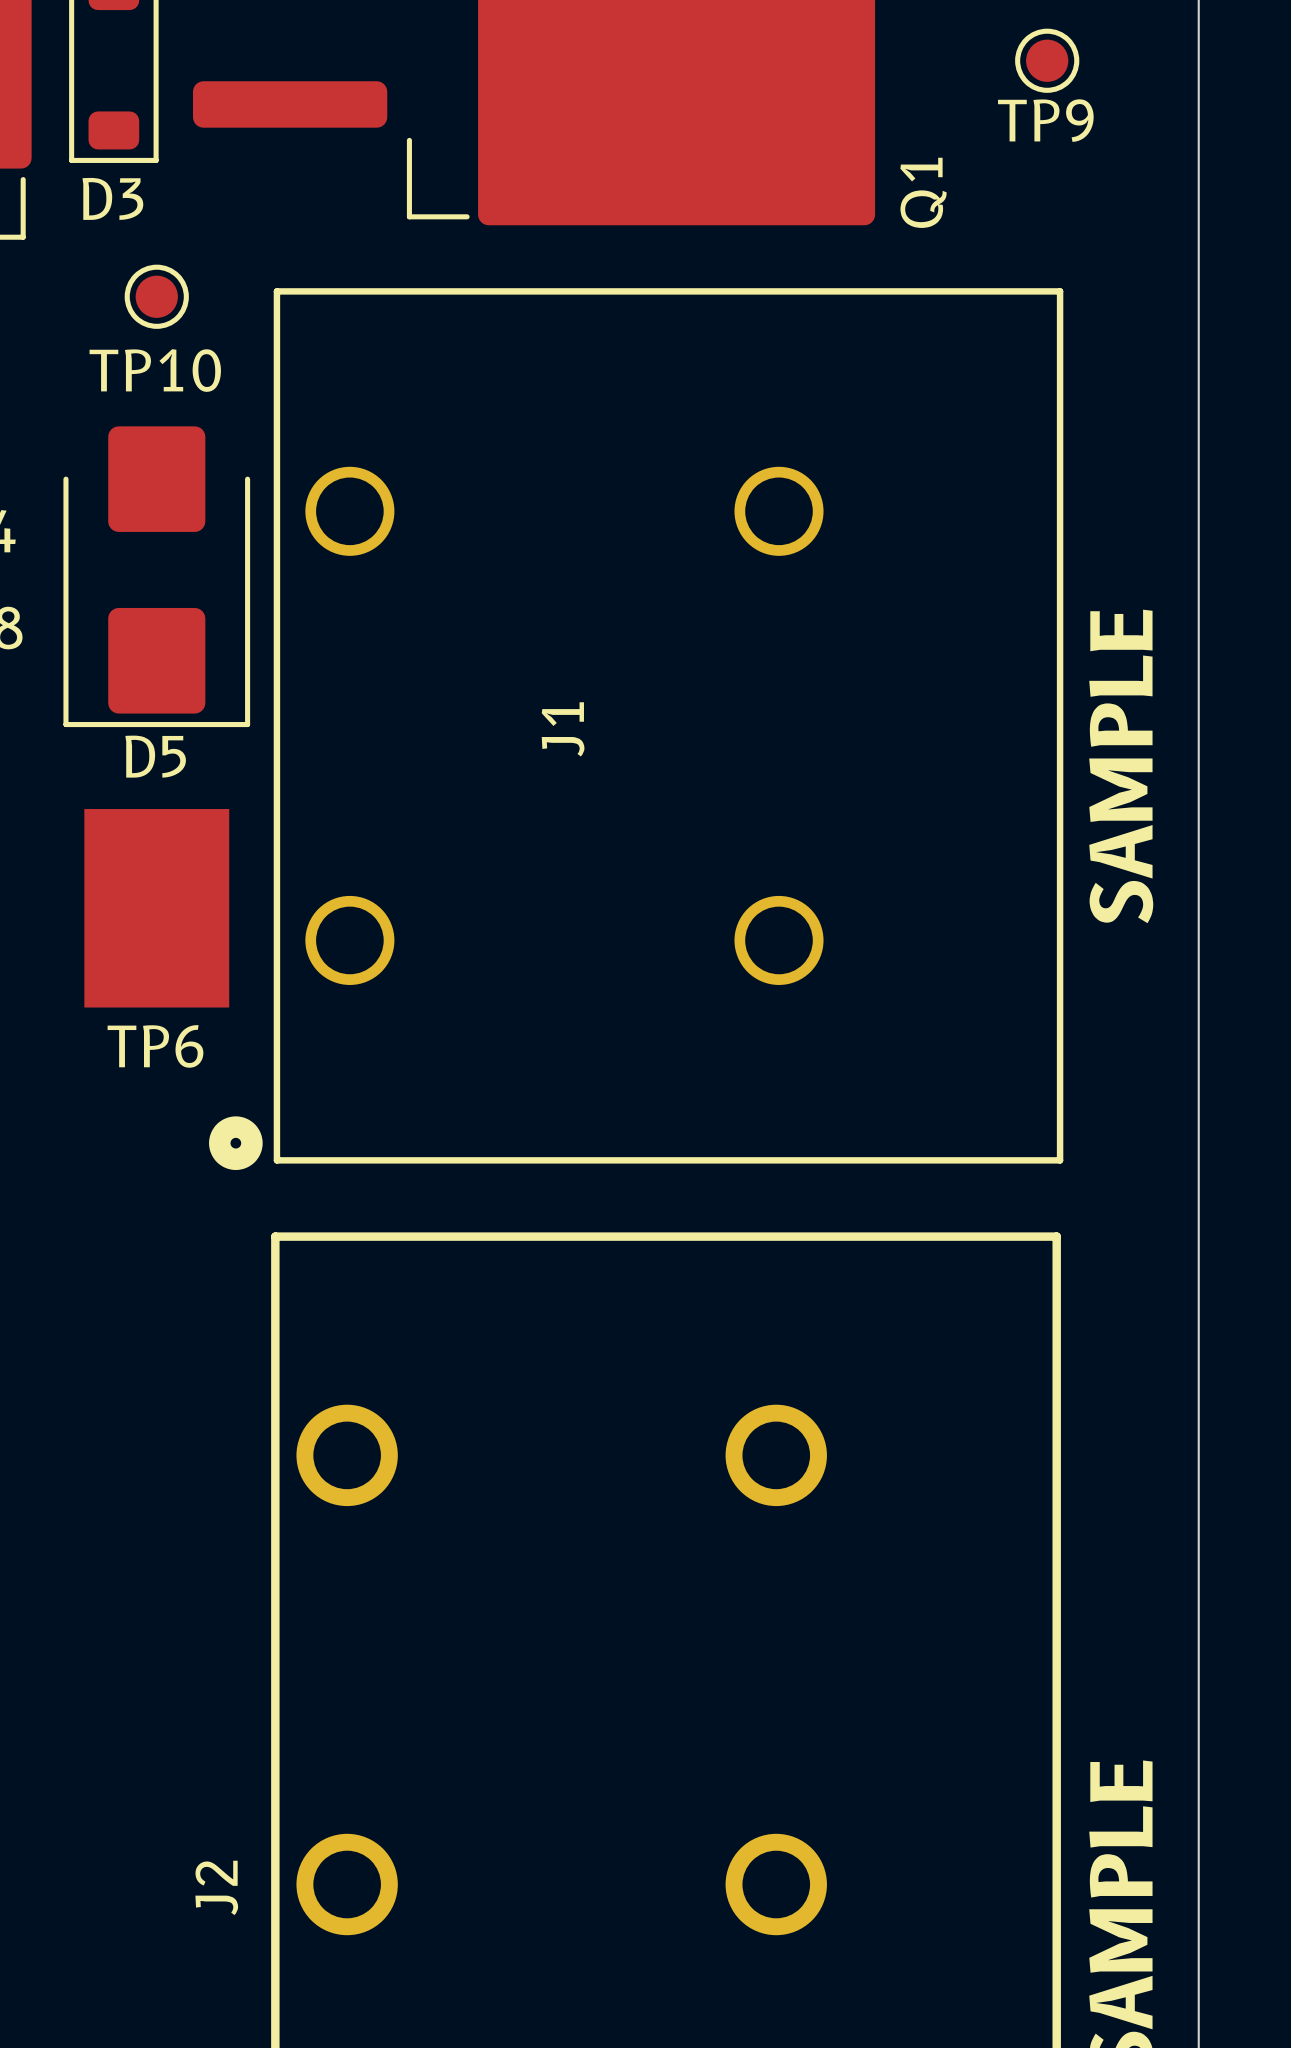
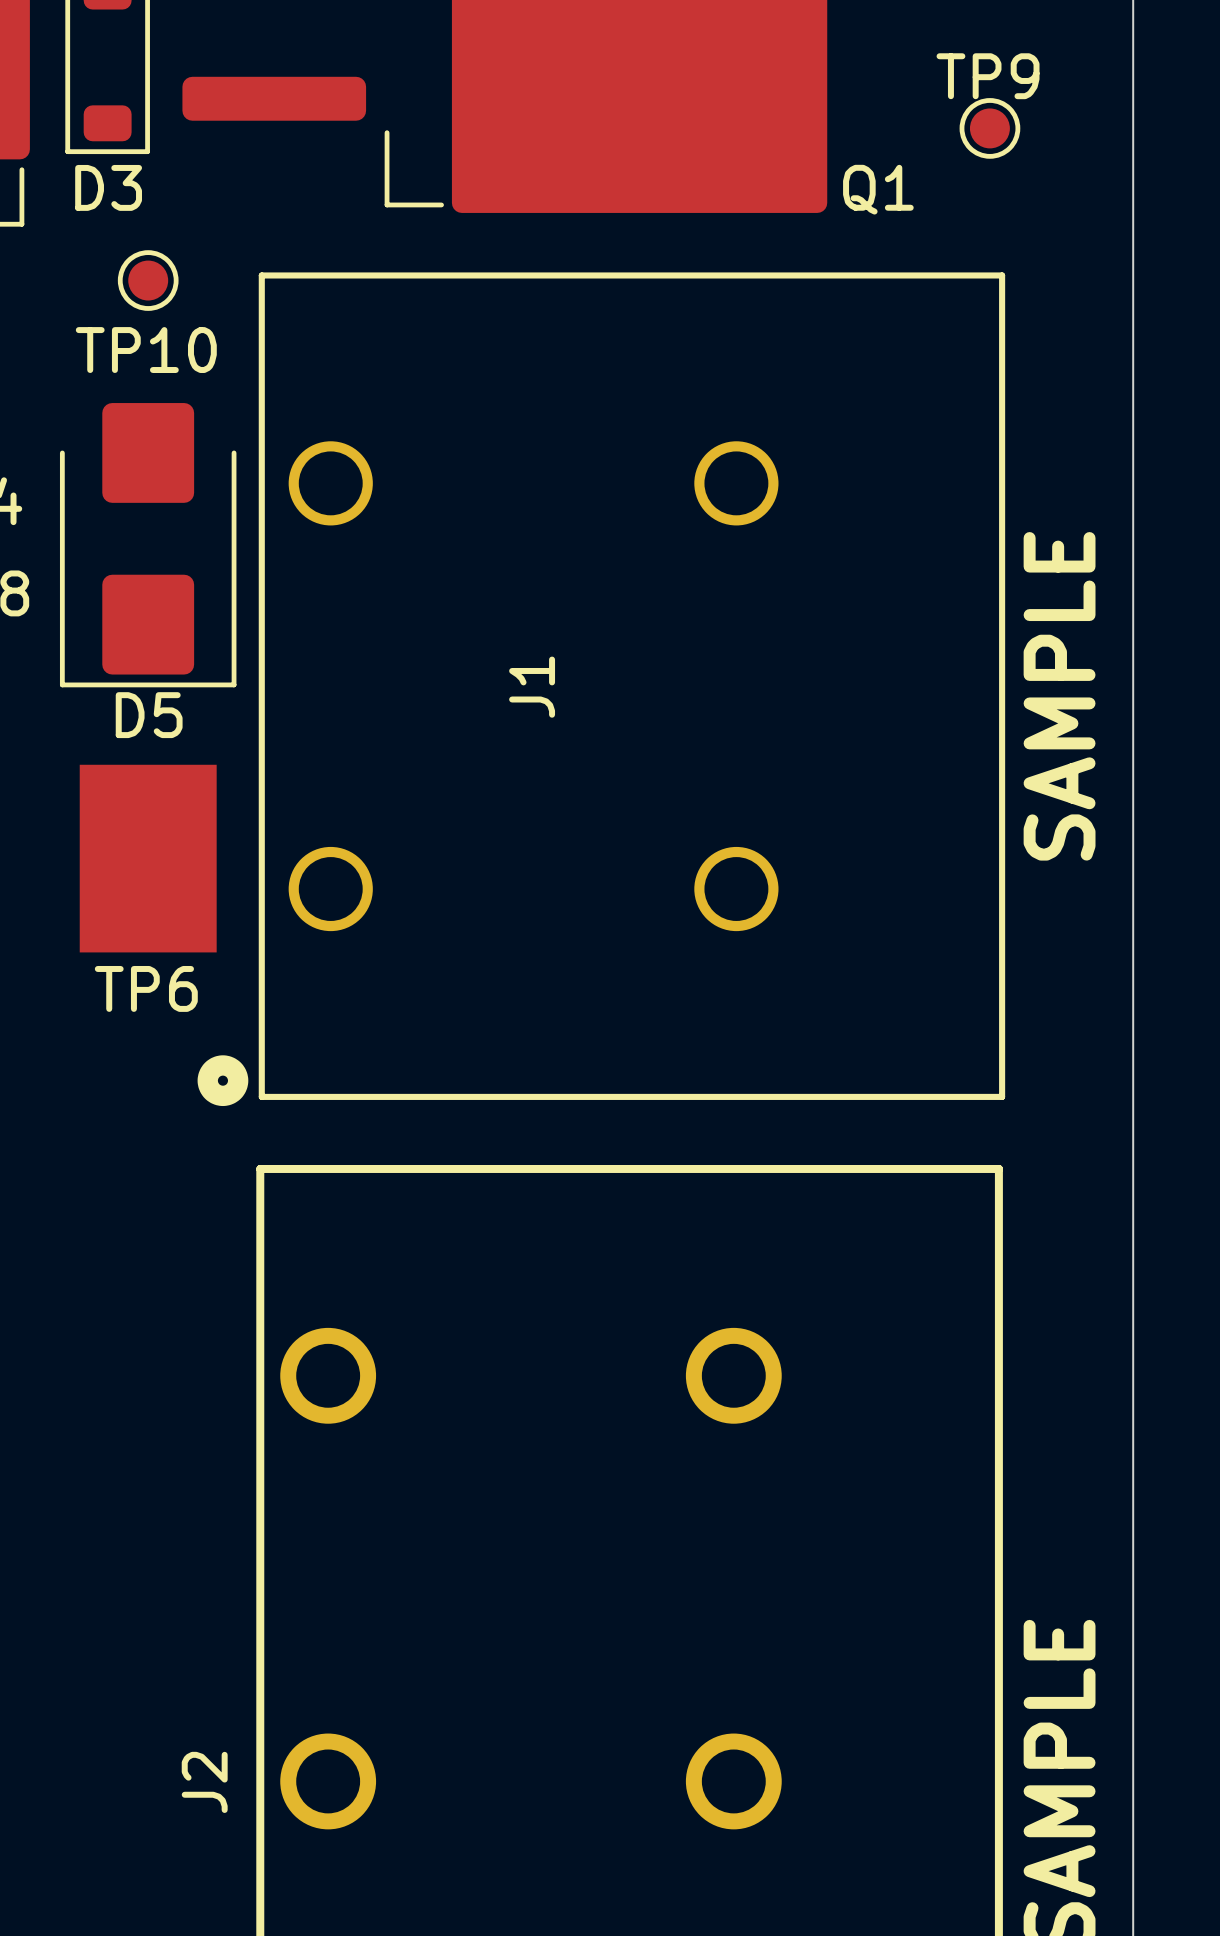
TP9 position: (1047, 60) -> (989, 128)
TP9 name position: TP9 (1045, 120) -> TP9 (988, 76)
Q1 name rotation: 0° (923, 192) -> 90° clockwise (878, 189)

